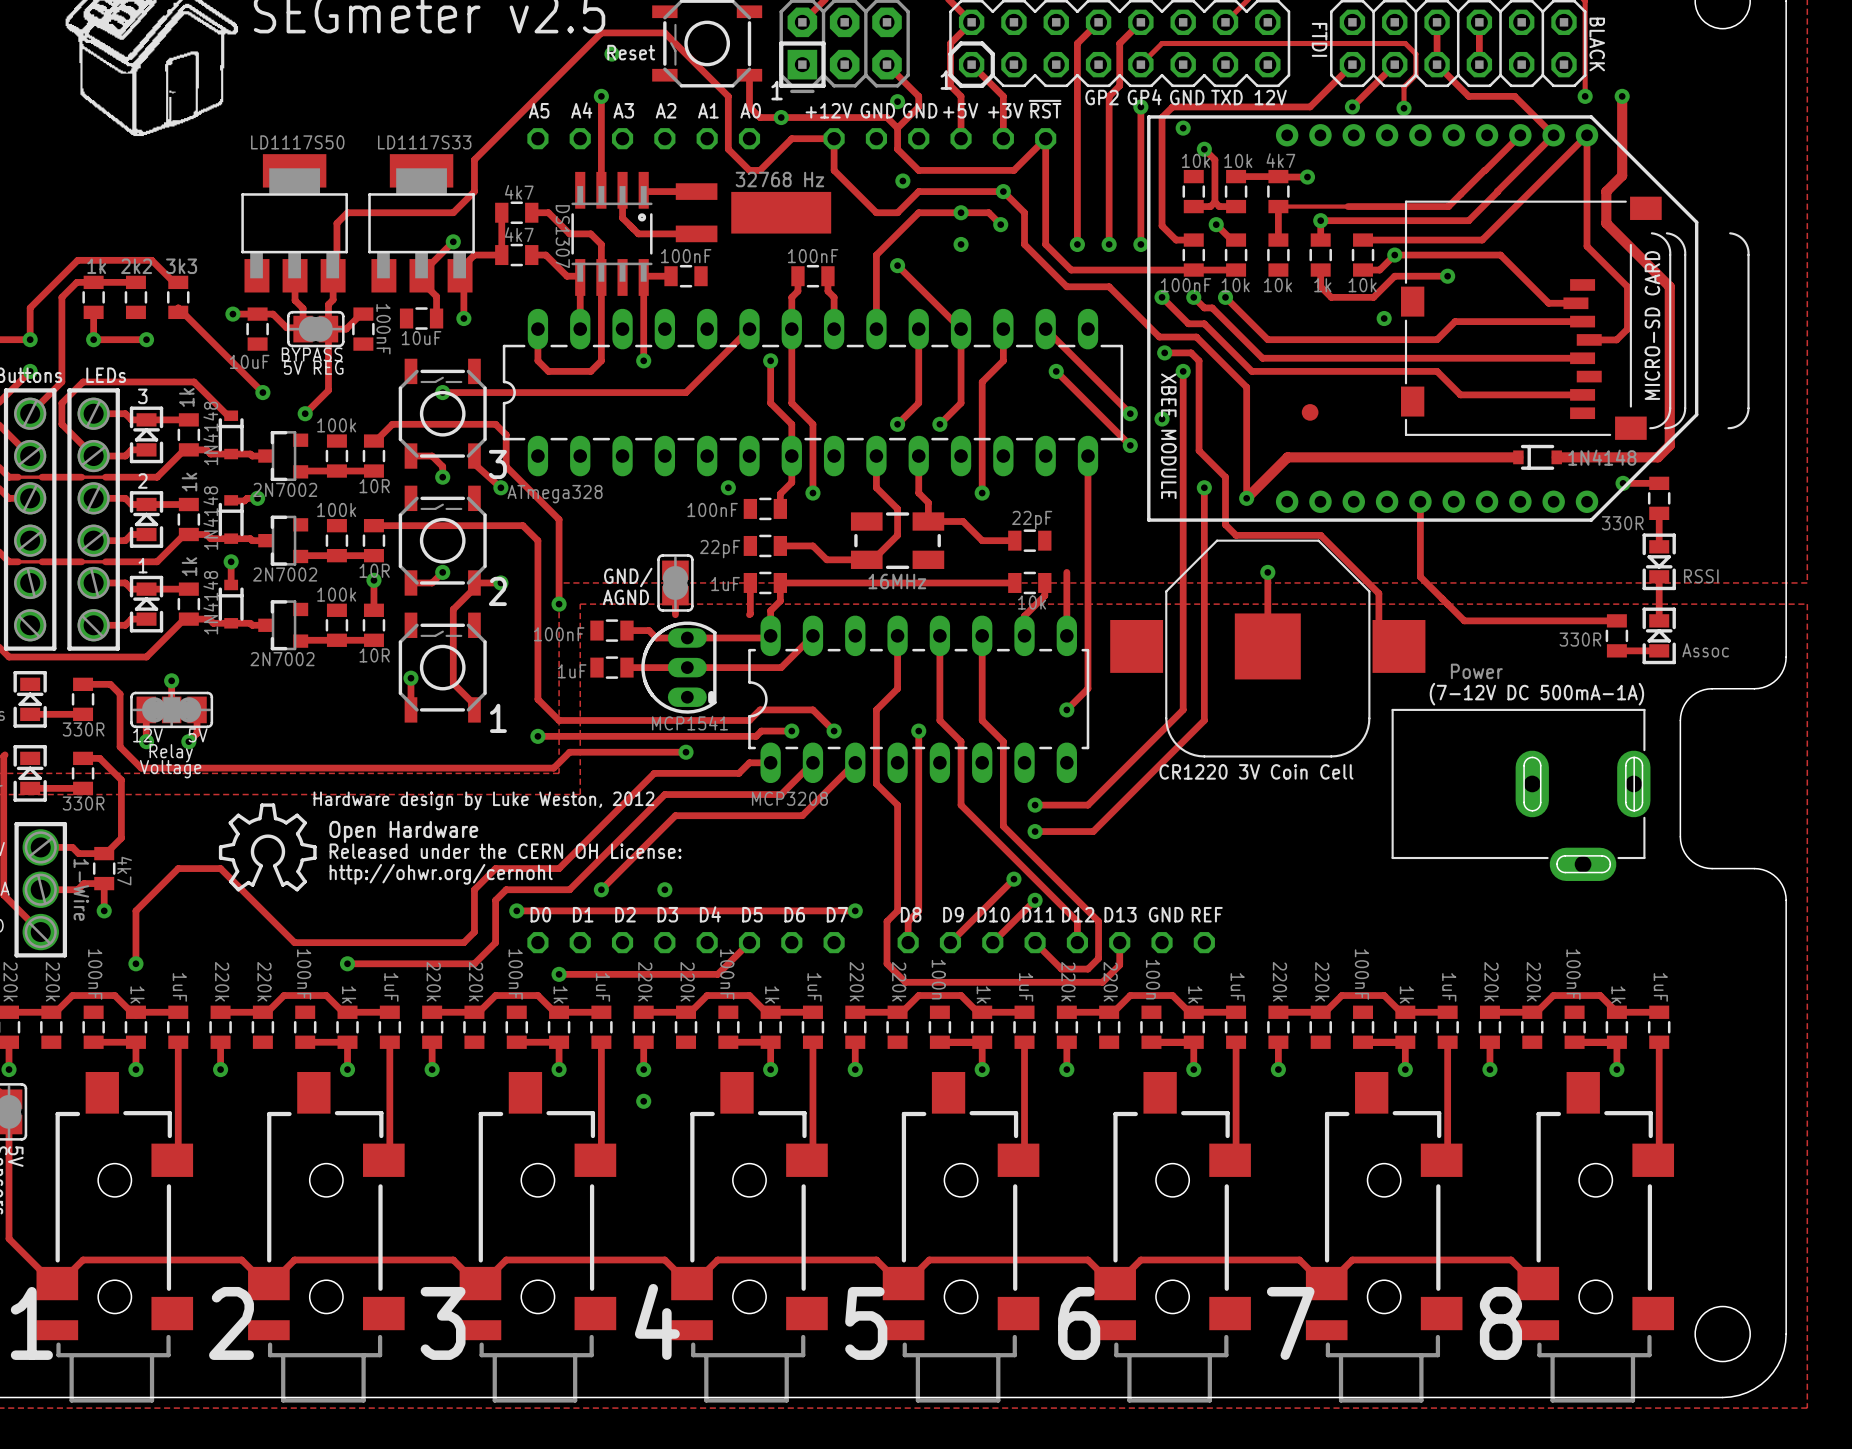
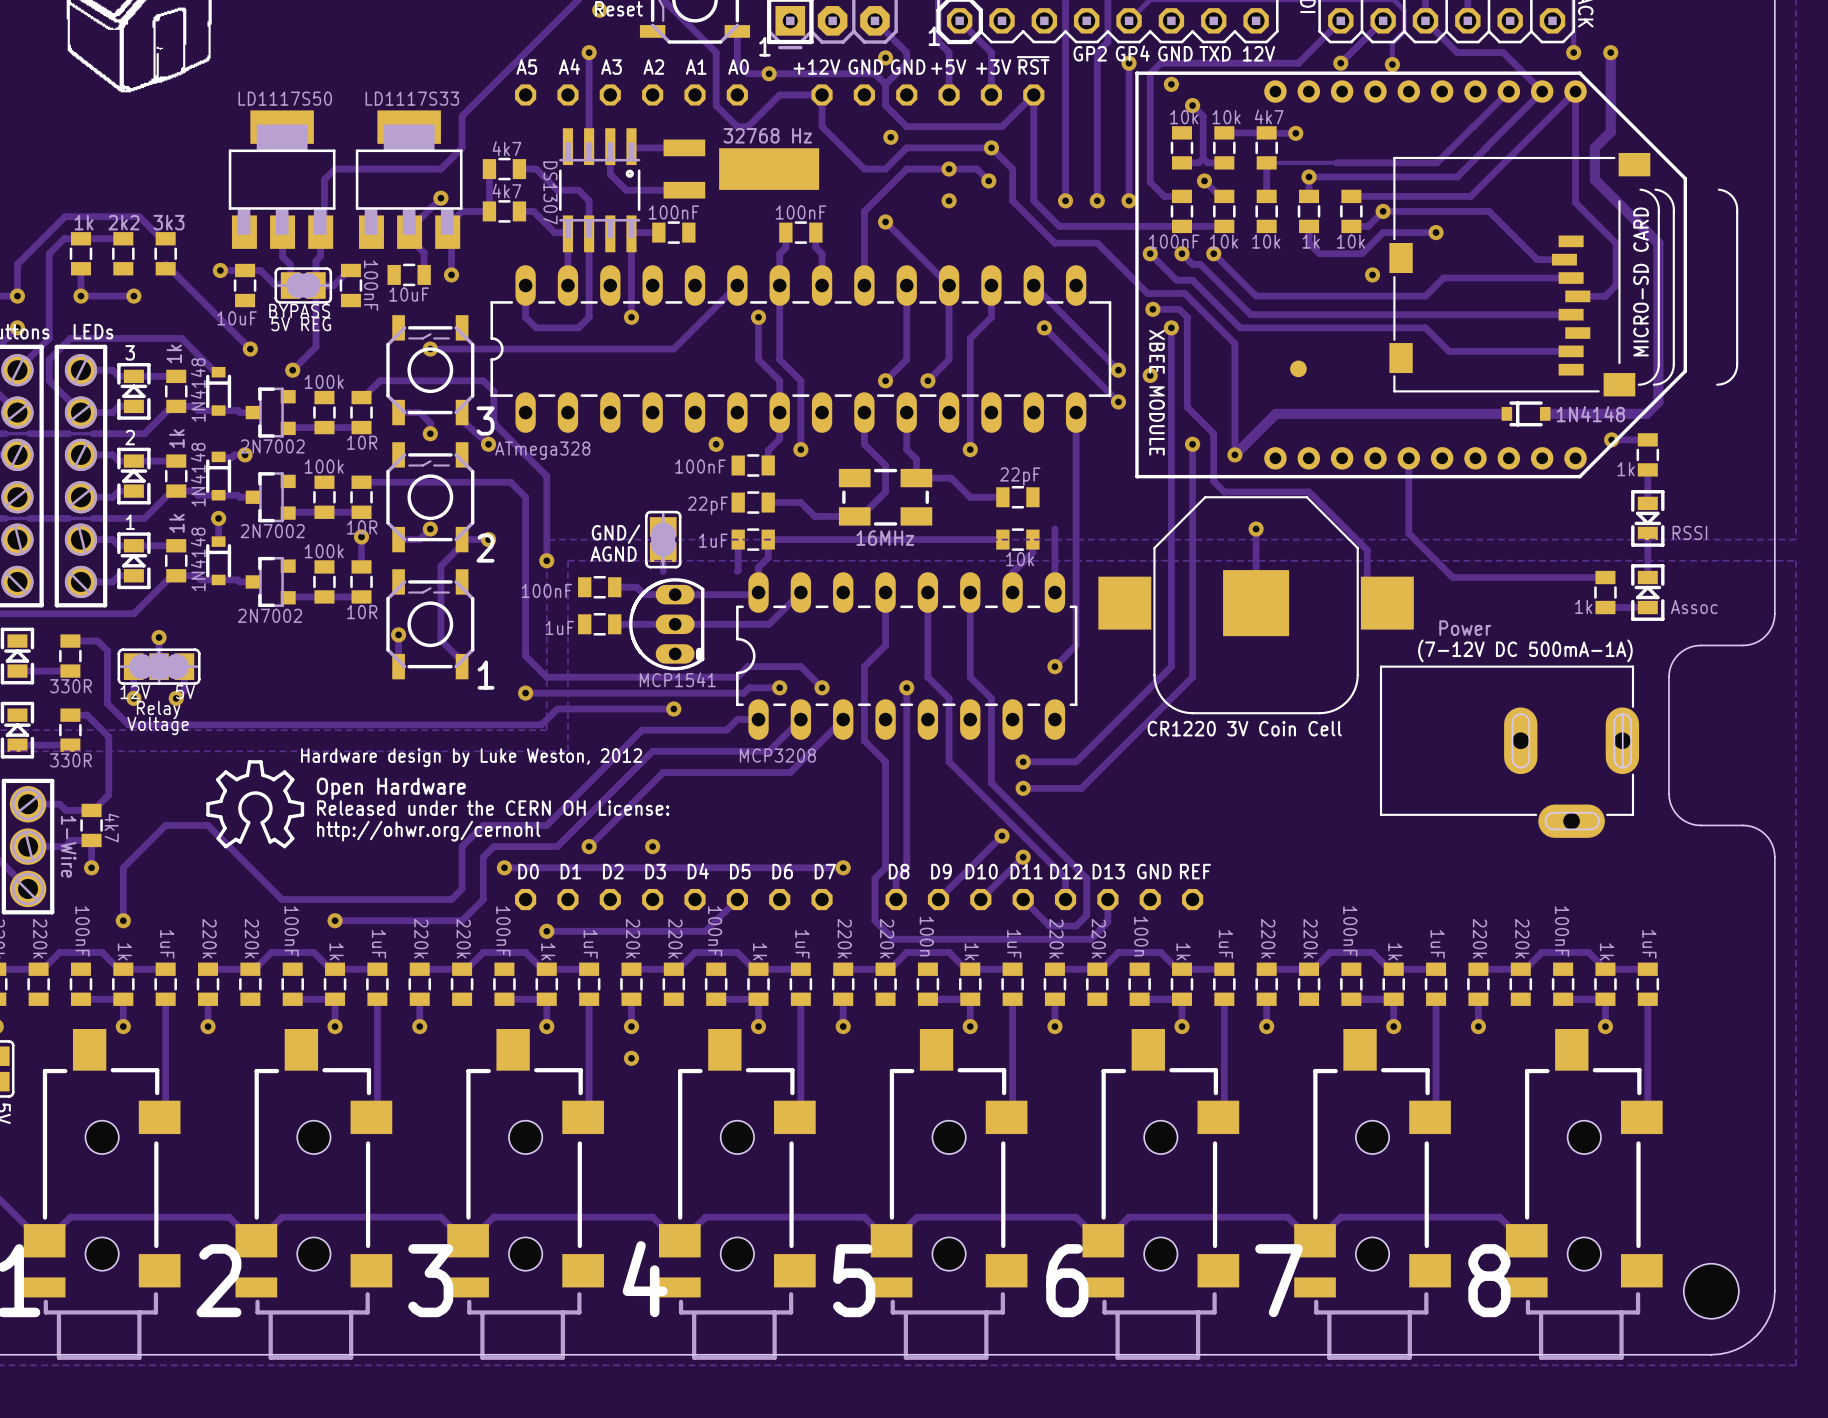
part value: 330R (1622, 523) -> 1k (1626, 469)
part value: 330R (1580, 639) -> 1k (1583, 606)

